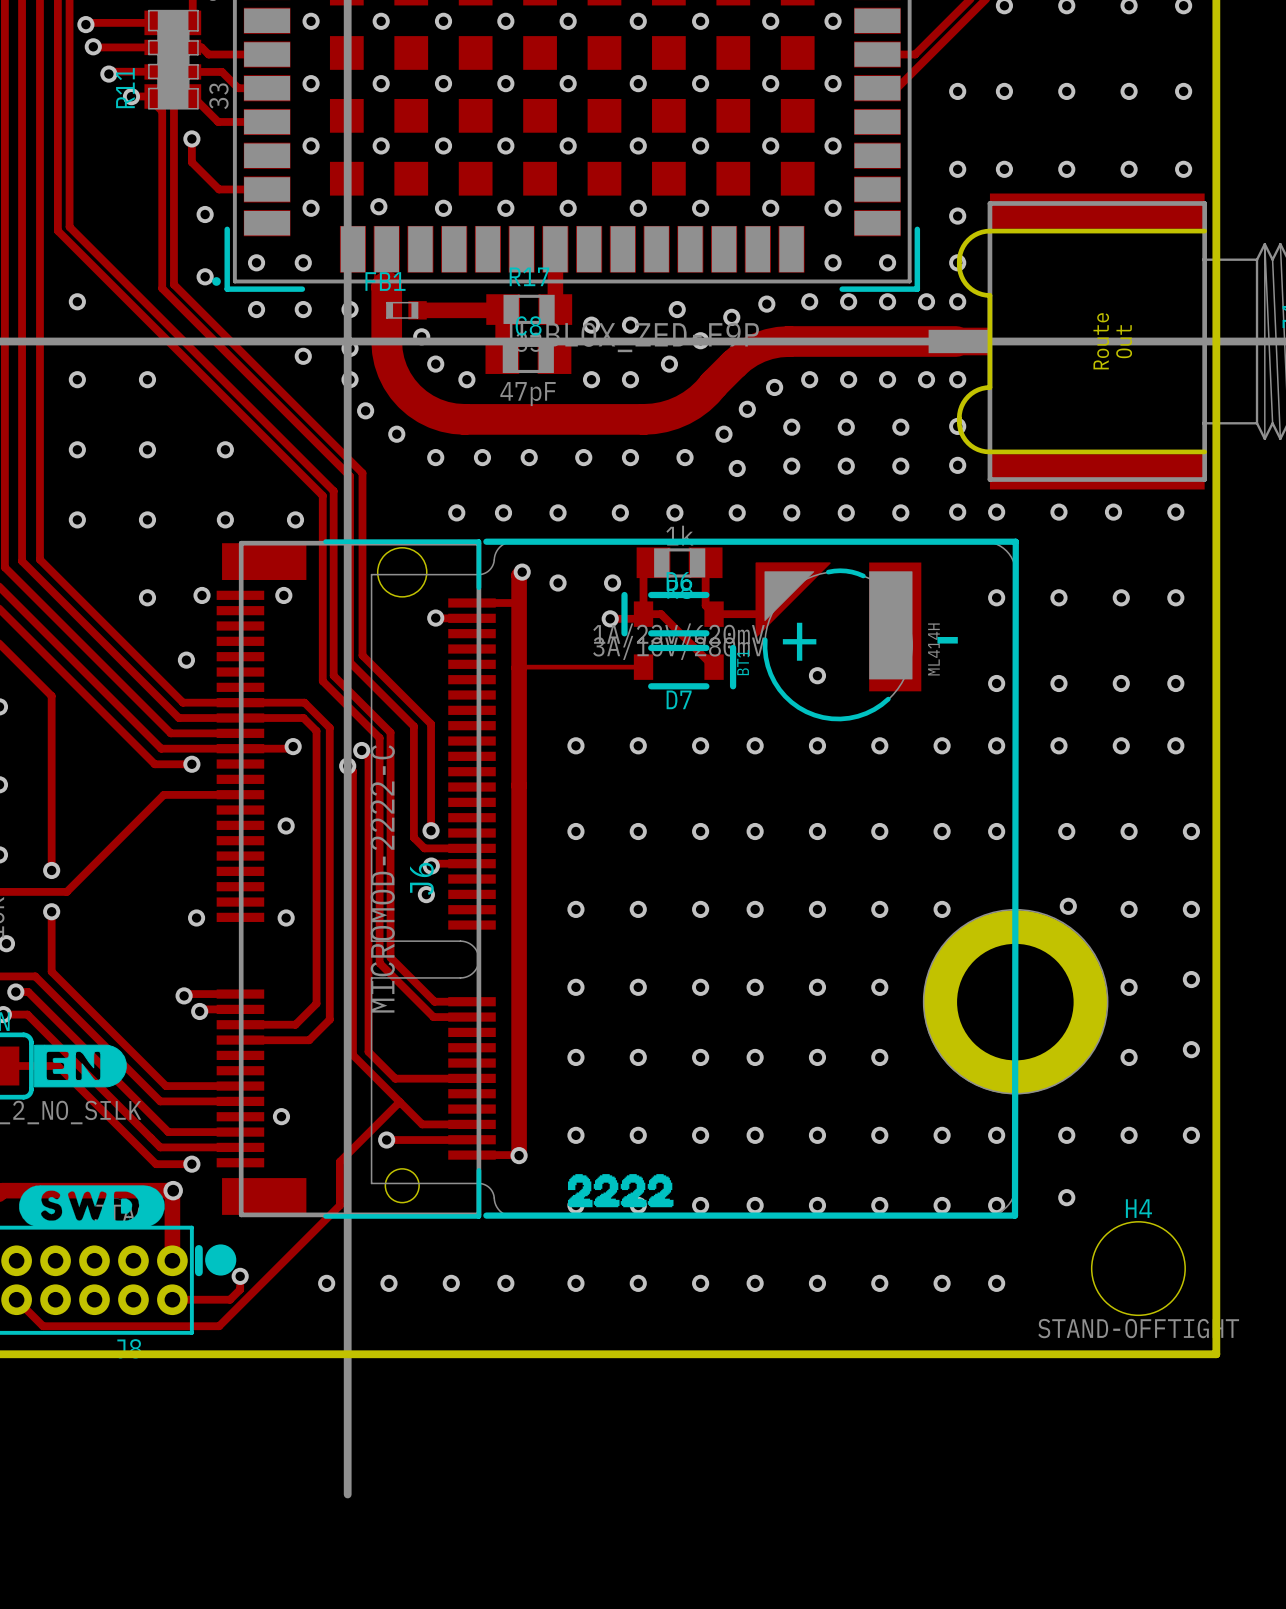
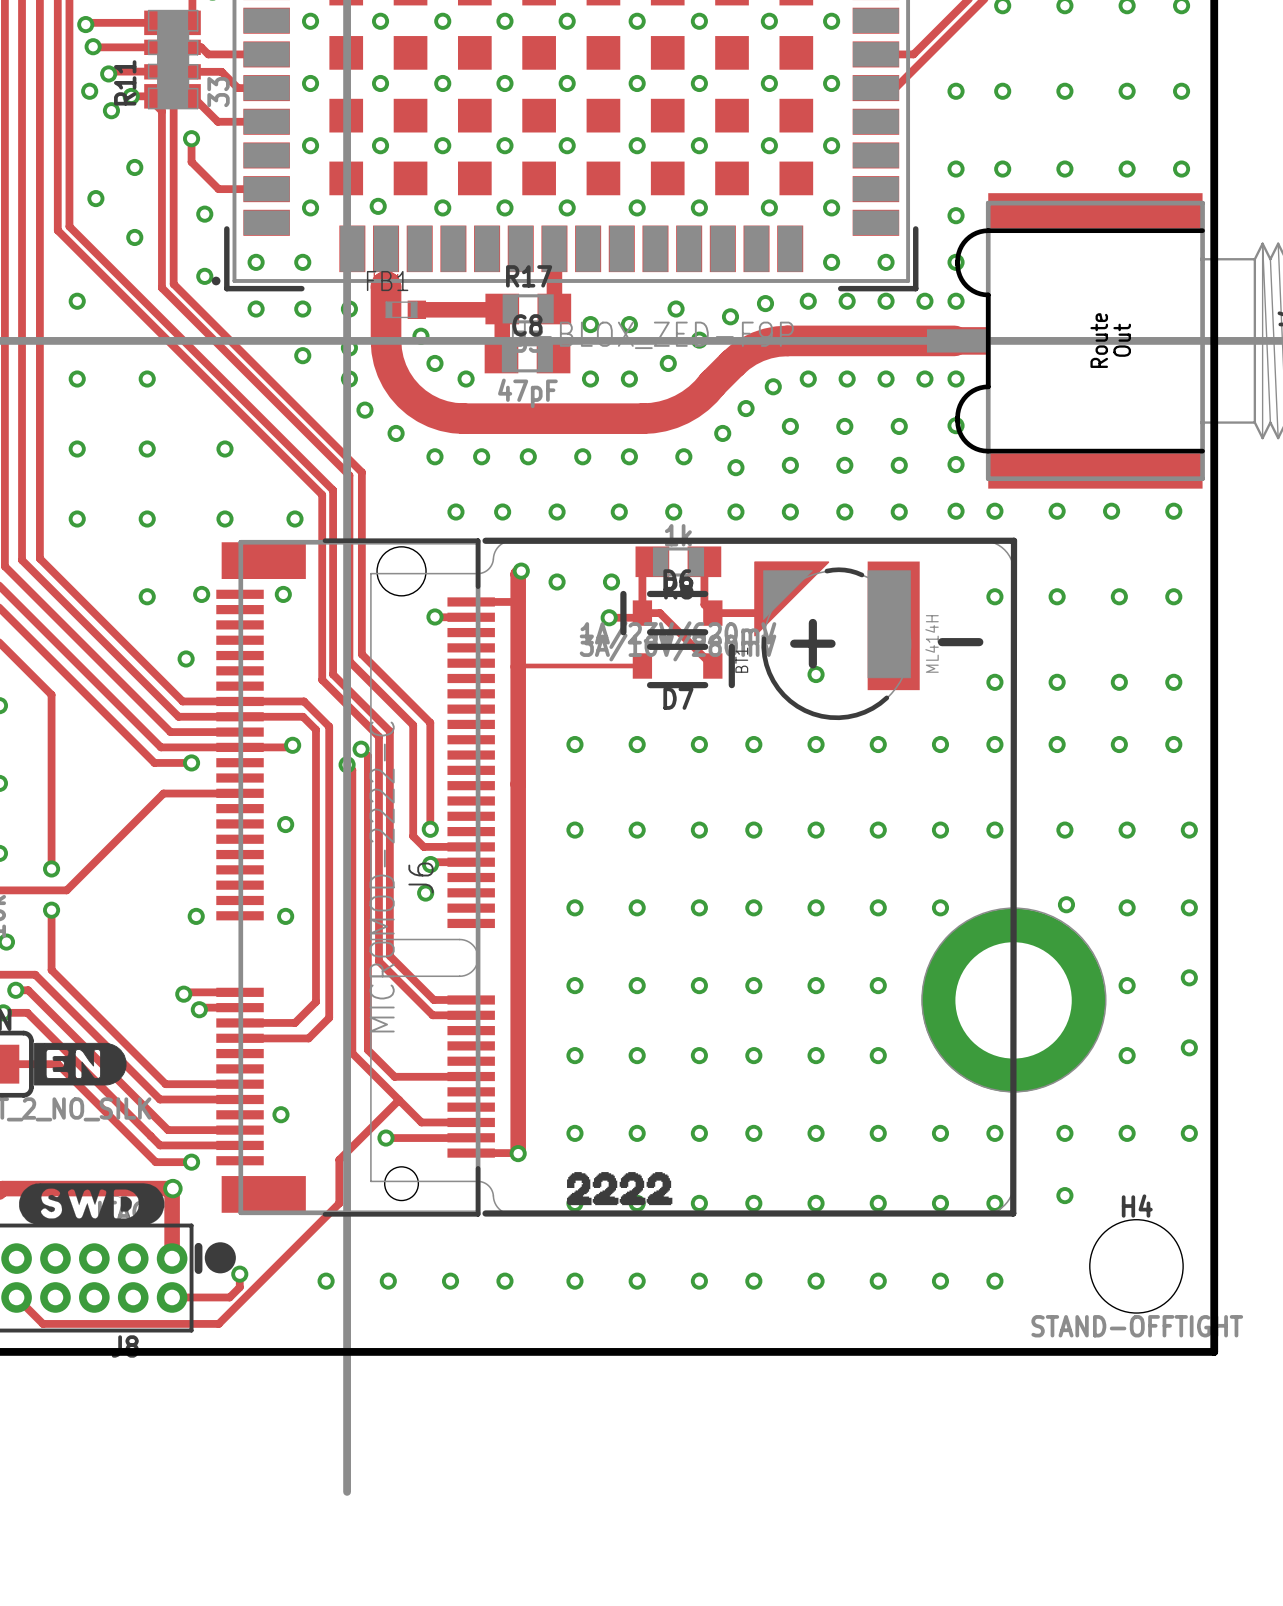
via: none -> (89, 91)
via: none -> (111, 110)
via: none -> (134, 167)
via: none -> (95, 198)
via: none -> (134, 237)

